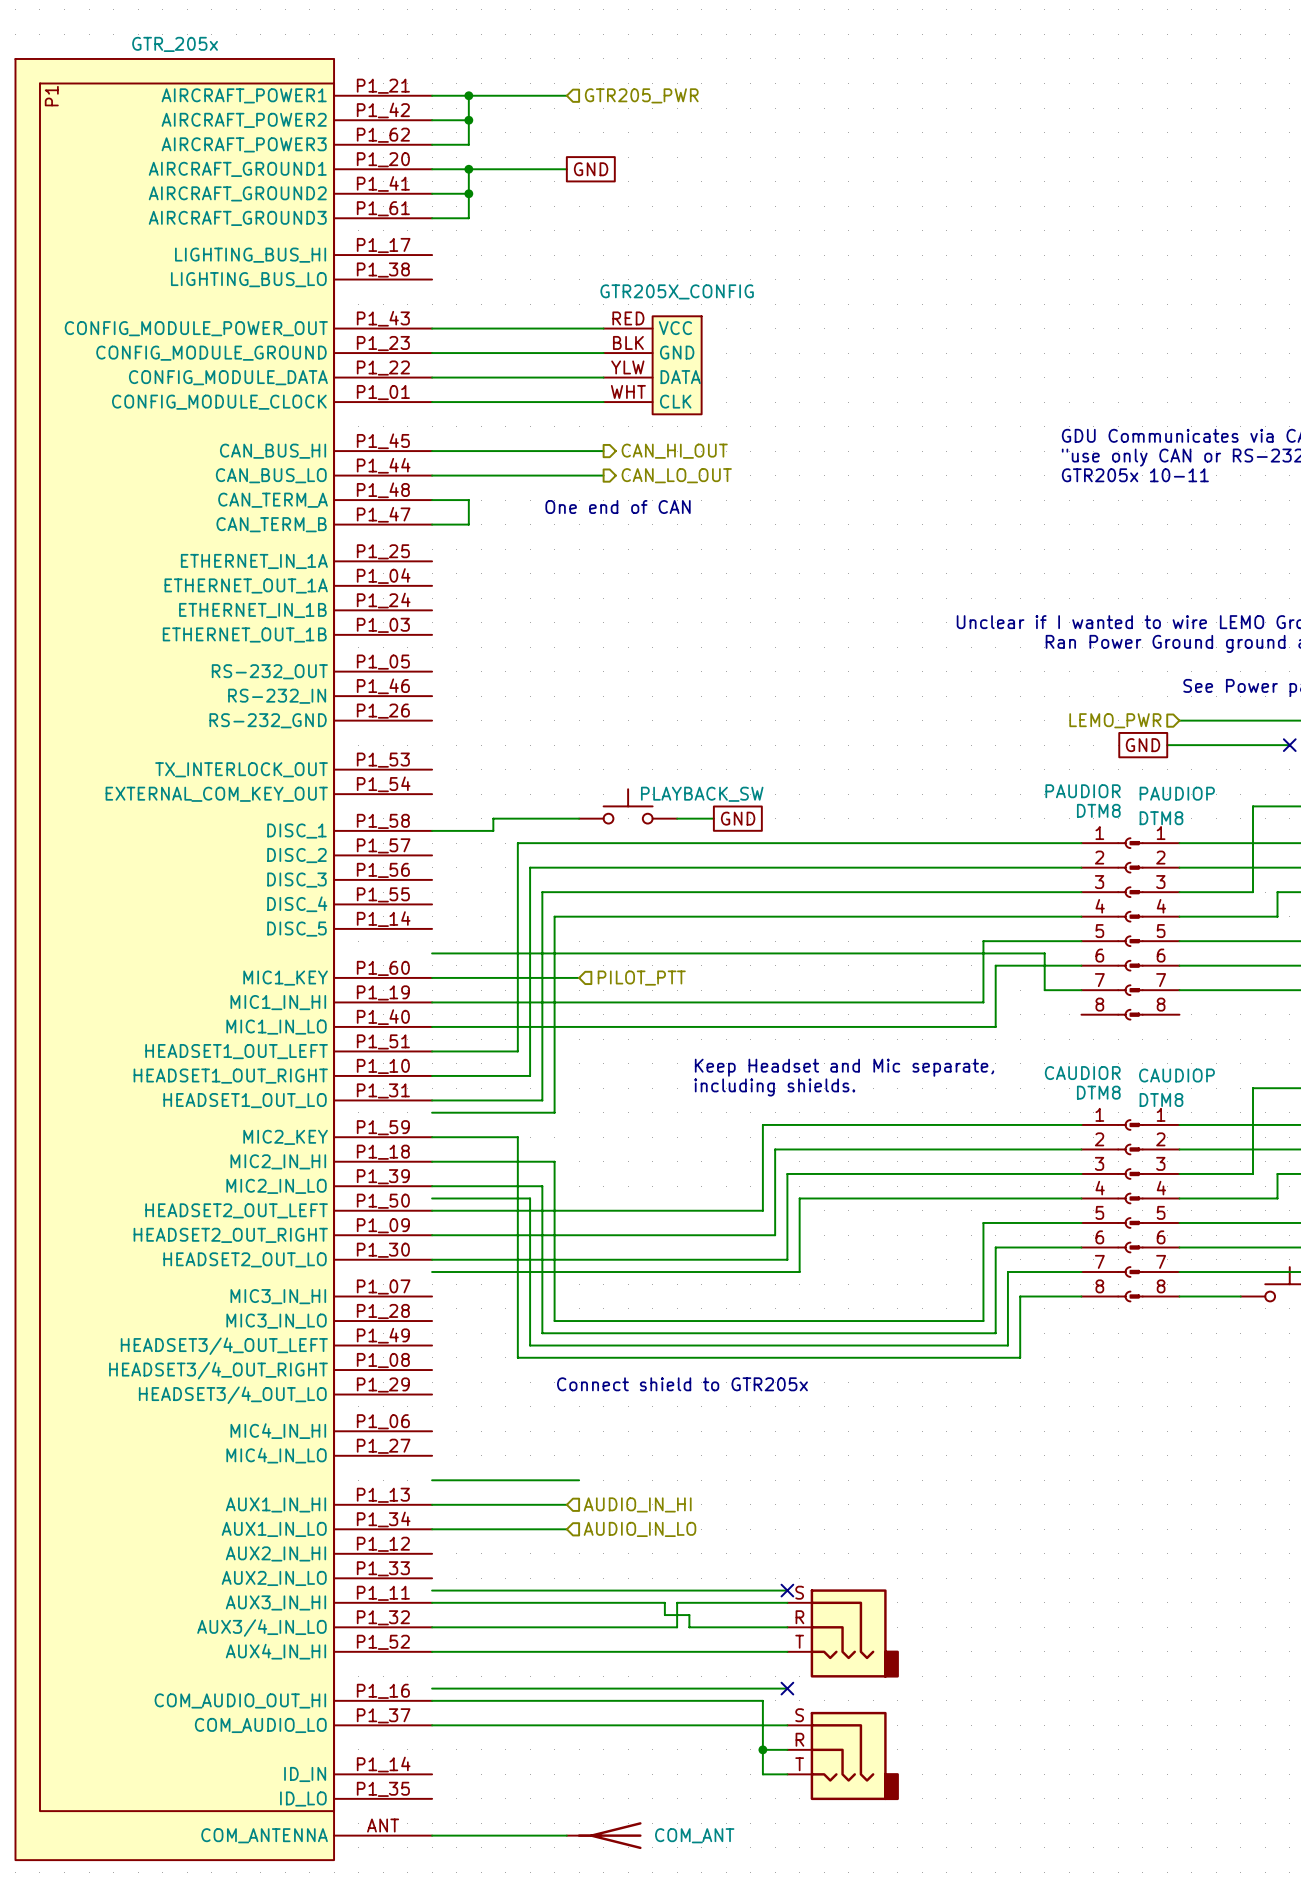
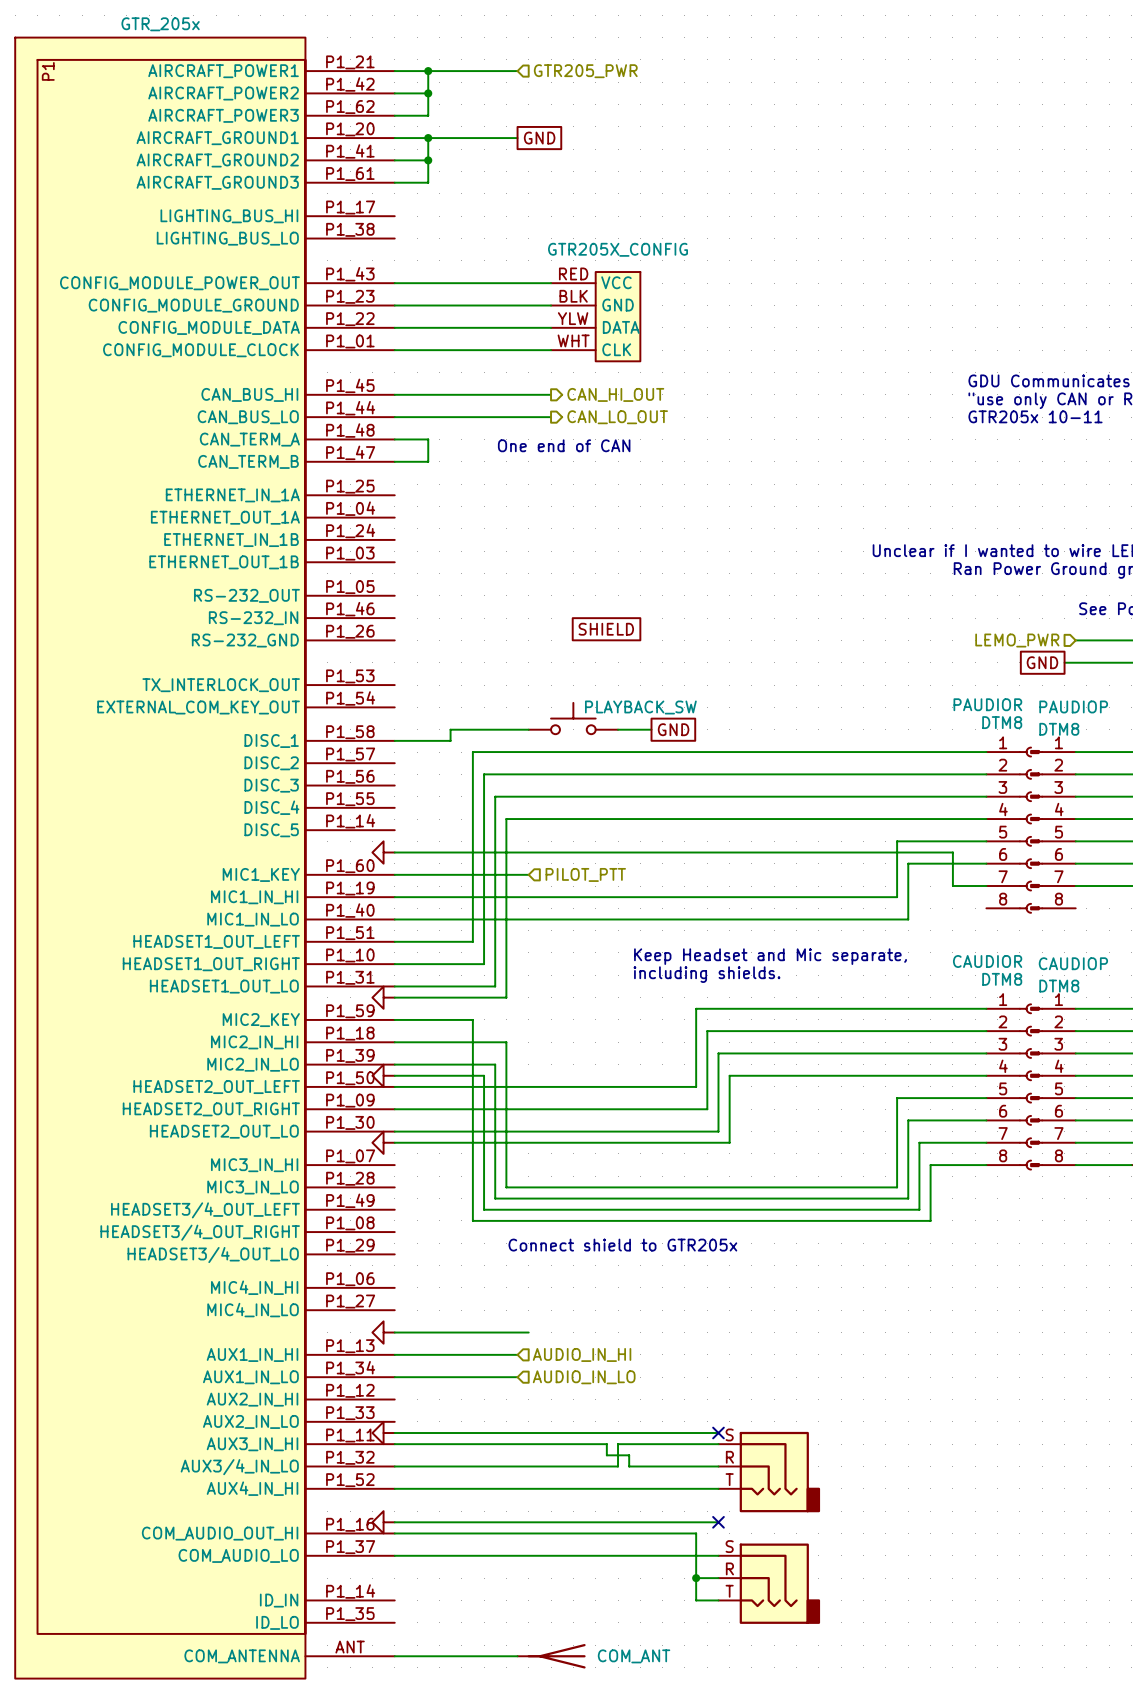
global label: none -> SHIELD (606, 629)
power symbol: none -> (383, 852)
power symbol: none -> (383, 997)
power symbol: none -> (383, 1075)
power symbol: none -> (383, 1142)
power symbol: none -> (383, 1332)
power symbol: none -> (383, 1433)
power symbol: none -> (383, 1522)

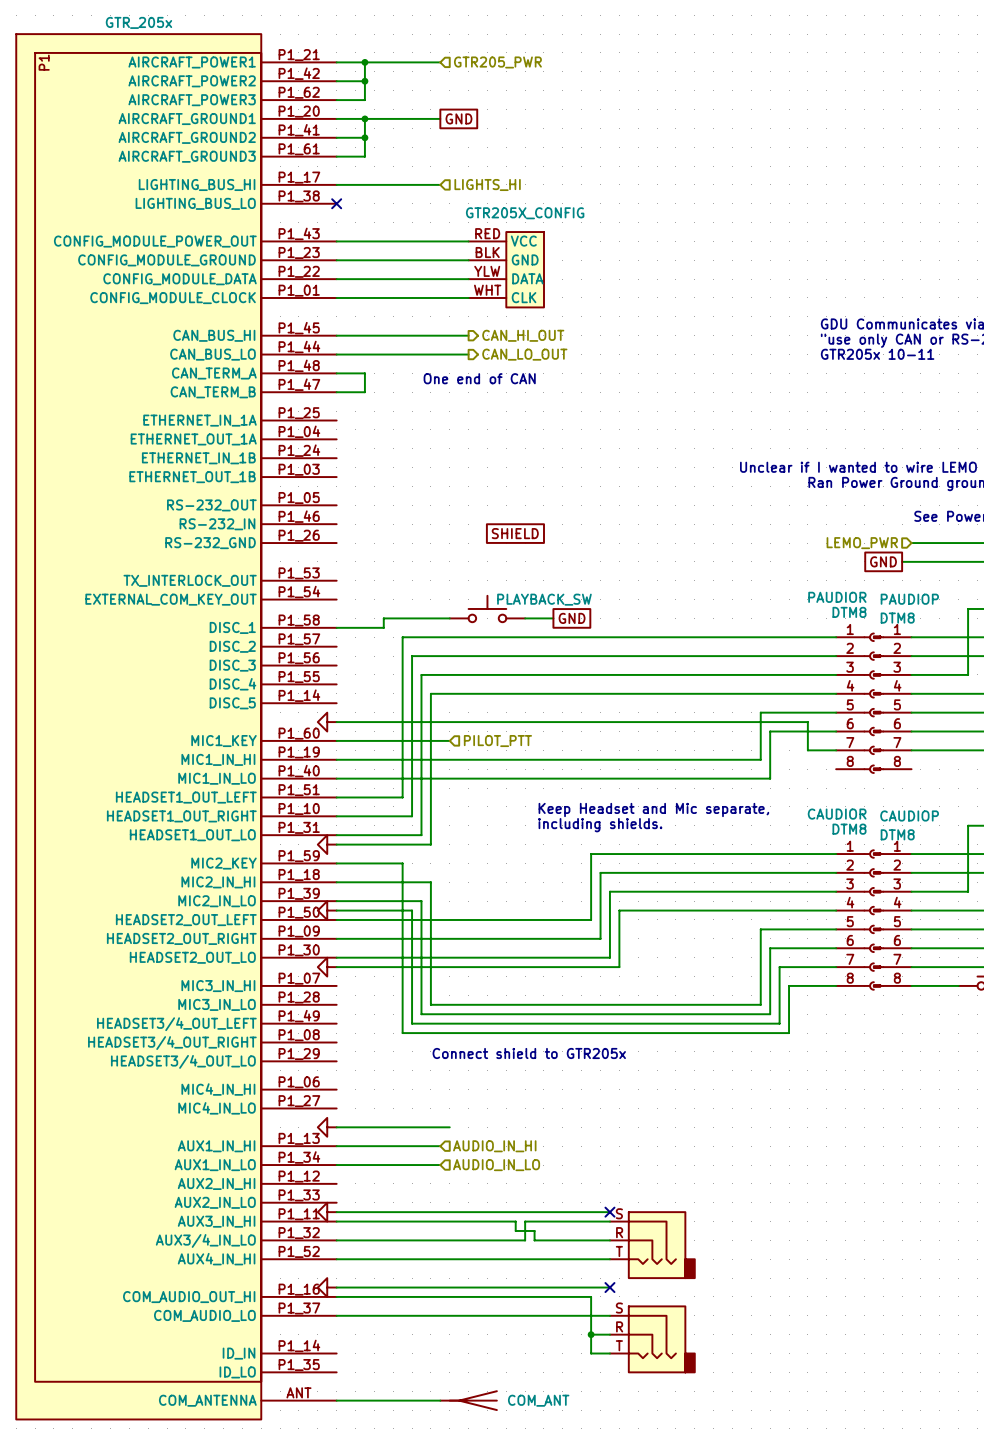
wire: none -> (336, 184) (440, 184)
hierarchical label: none -> LIGHTS_HI (487, 185)
no-connect mark: none -> (336, 203)

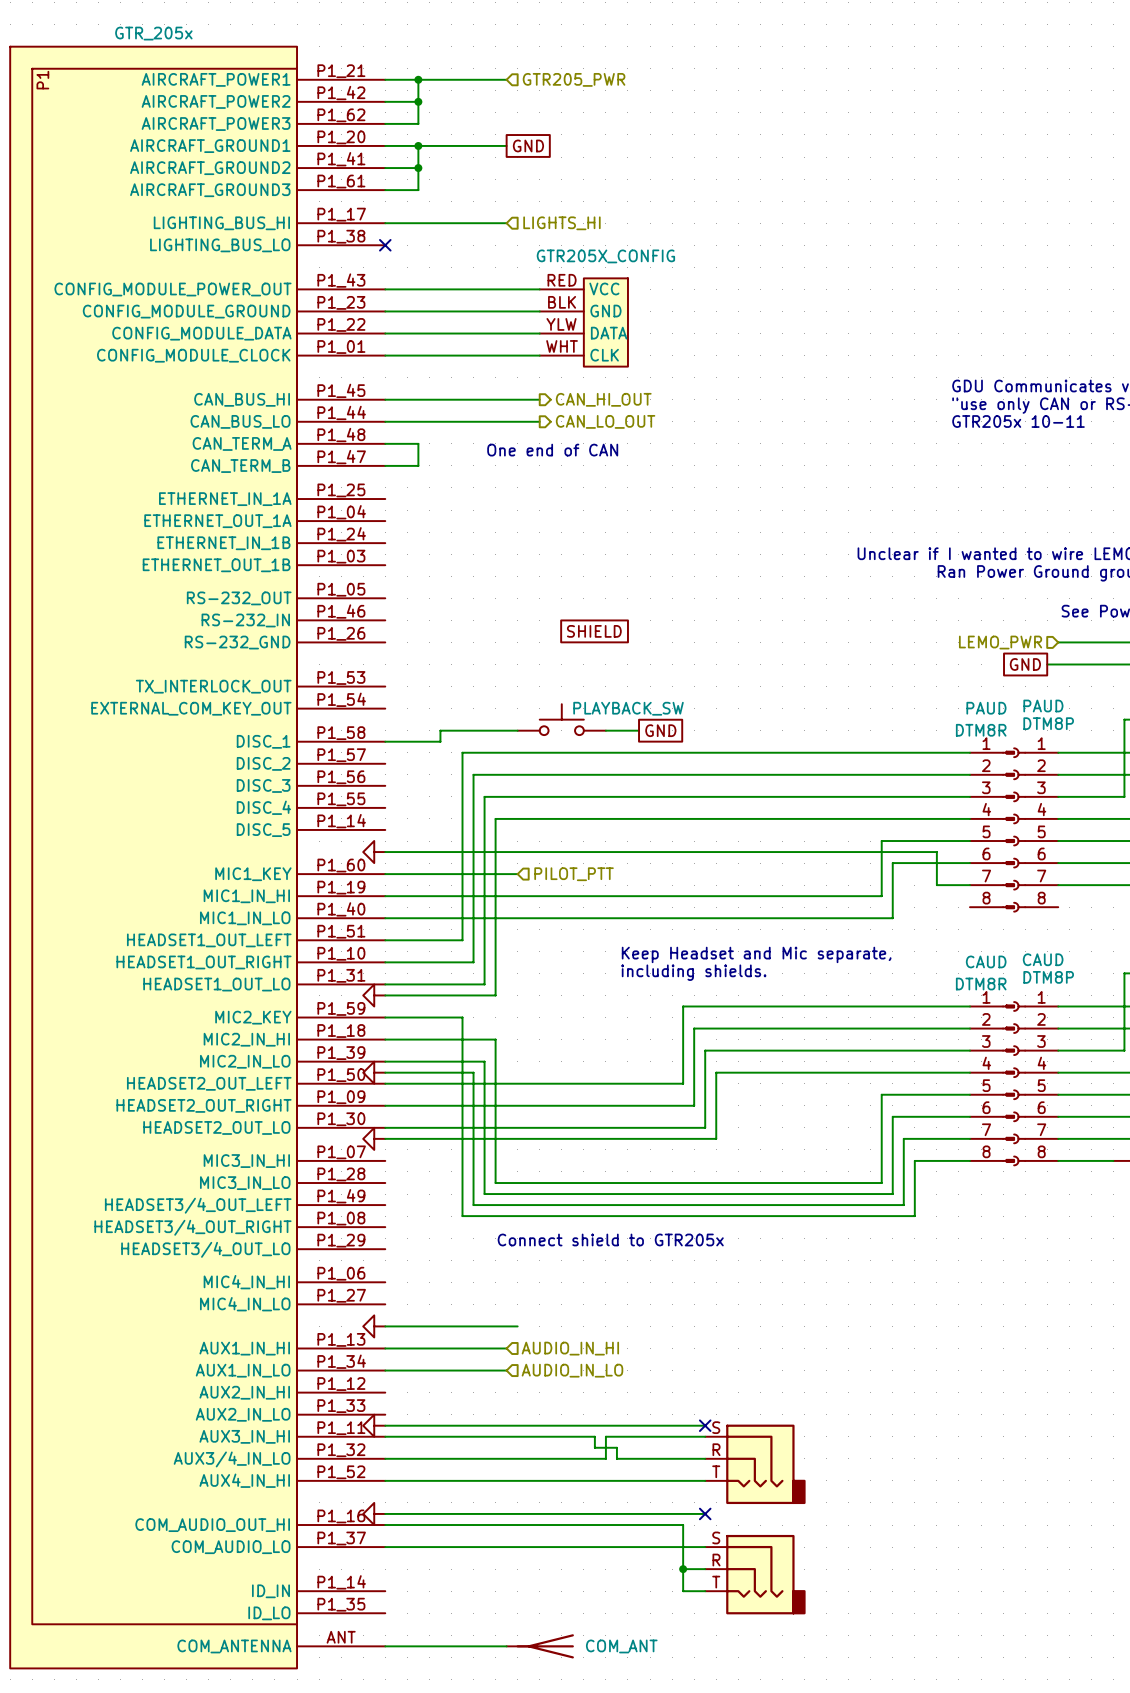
PAUDIOR: DTM8 (855, 703) -> none
PAUD: none -> DTM8R (992, 829)
PAUDIOP: DTM8 (892, 703) -> none
PAUD: none -> DTM8P (1035, 829)
CAUDIOR: DTM8 (855, 919) -> none
CAUD: none -> DTM8R (992, 1083)
CAUDIOP: DTM8 (892, 919) -> none
CAUD: none -> DTM8P (1035, 1083)

